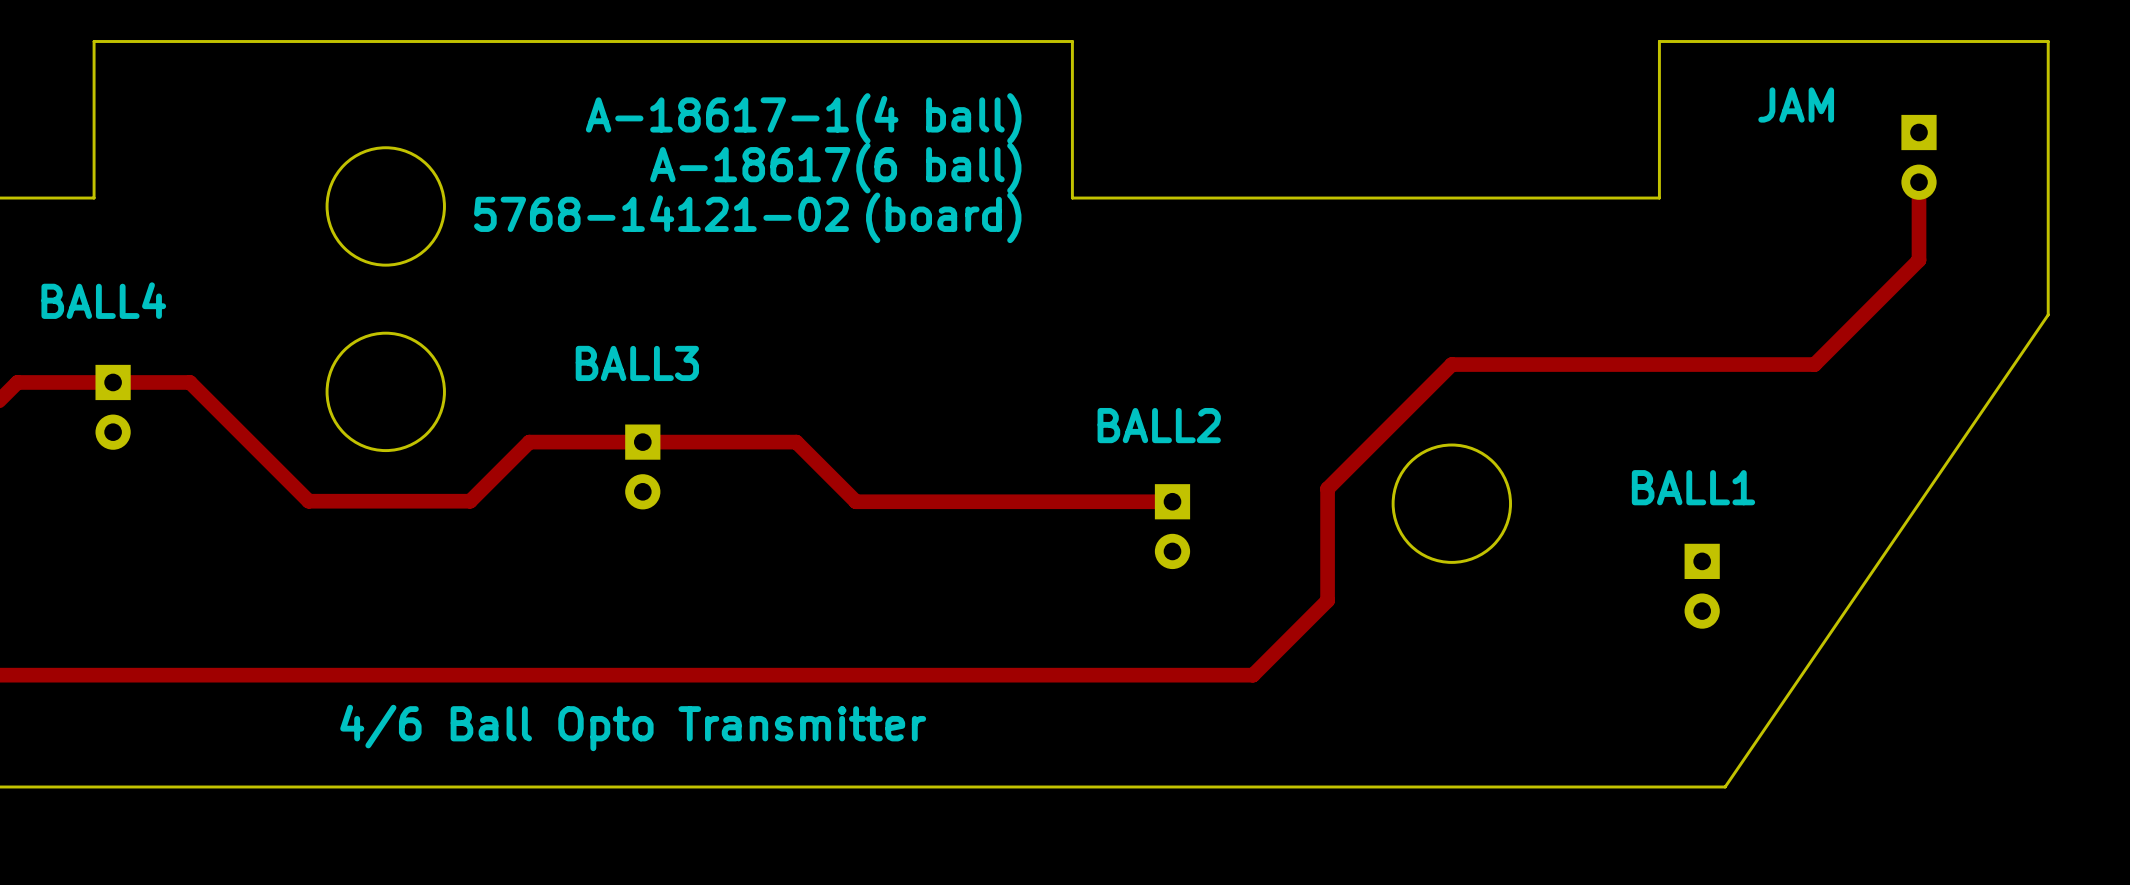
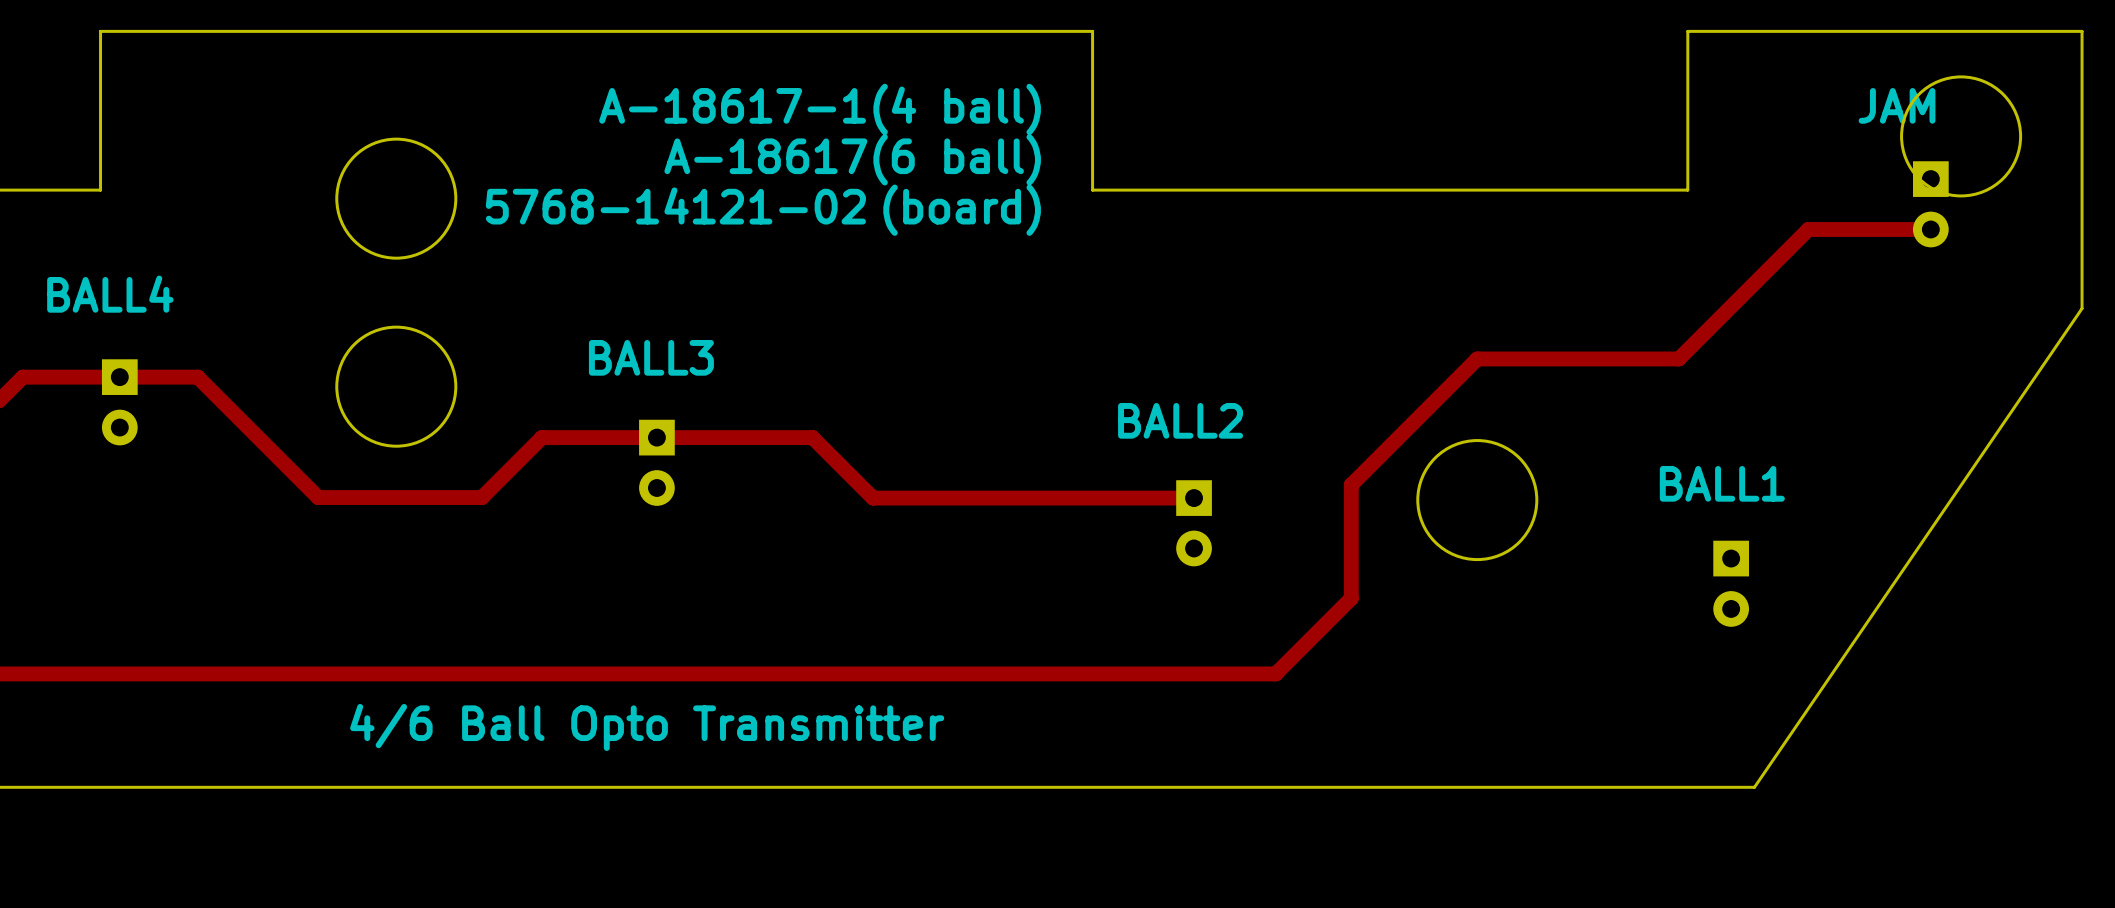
round board edge: none -> [1900, 75, 2023, 198]
text position: JAM (1796, 105) -> JAM (1897, 105)
part position: (1919, 157) -> (1930, 204)
track: (1919, 182) (1919, 260) (1814, 364) (1650, 364) -> (1930, 229) (1808, 229) (1678, 358)

